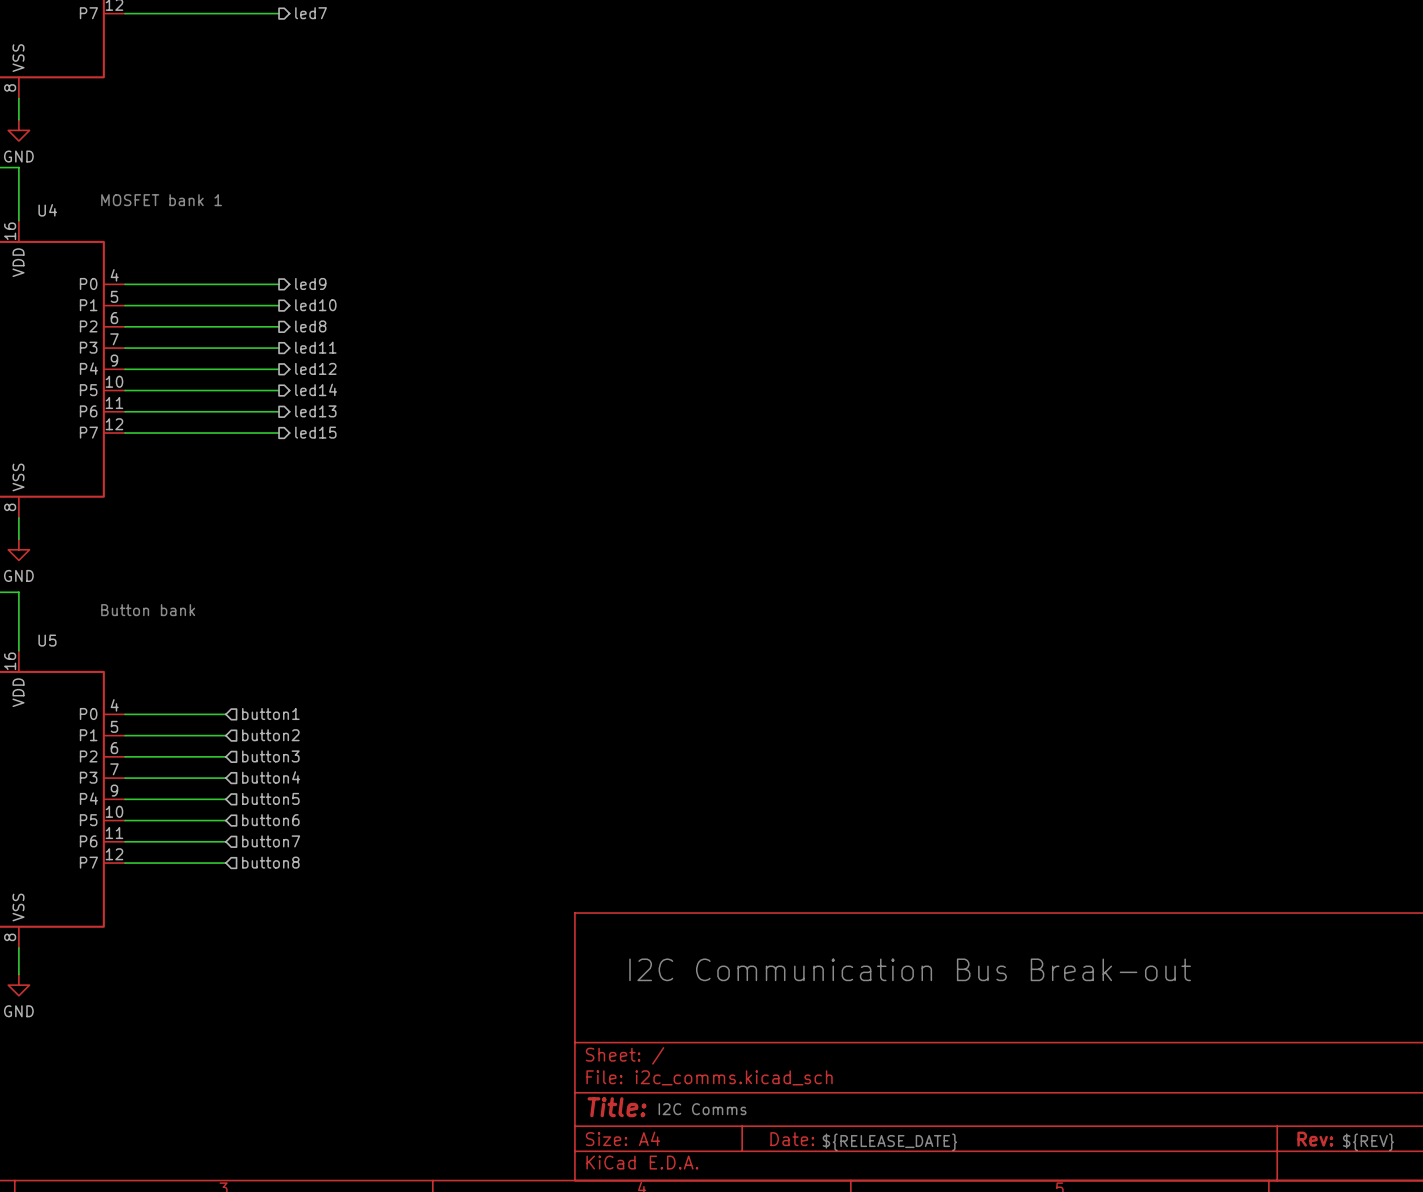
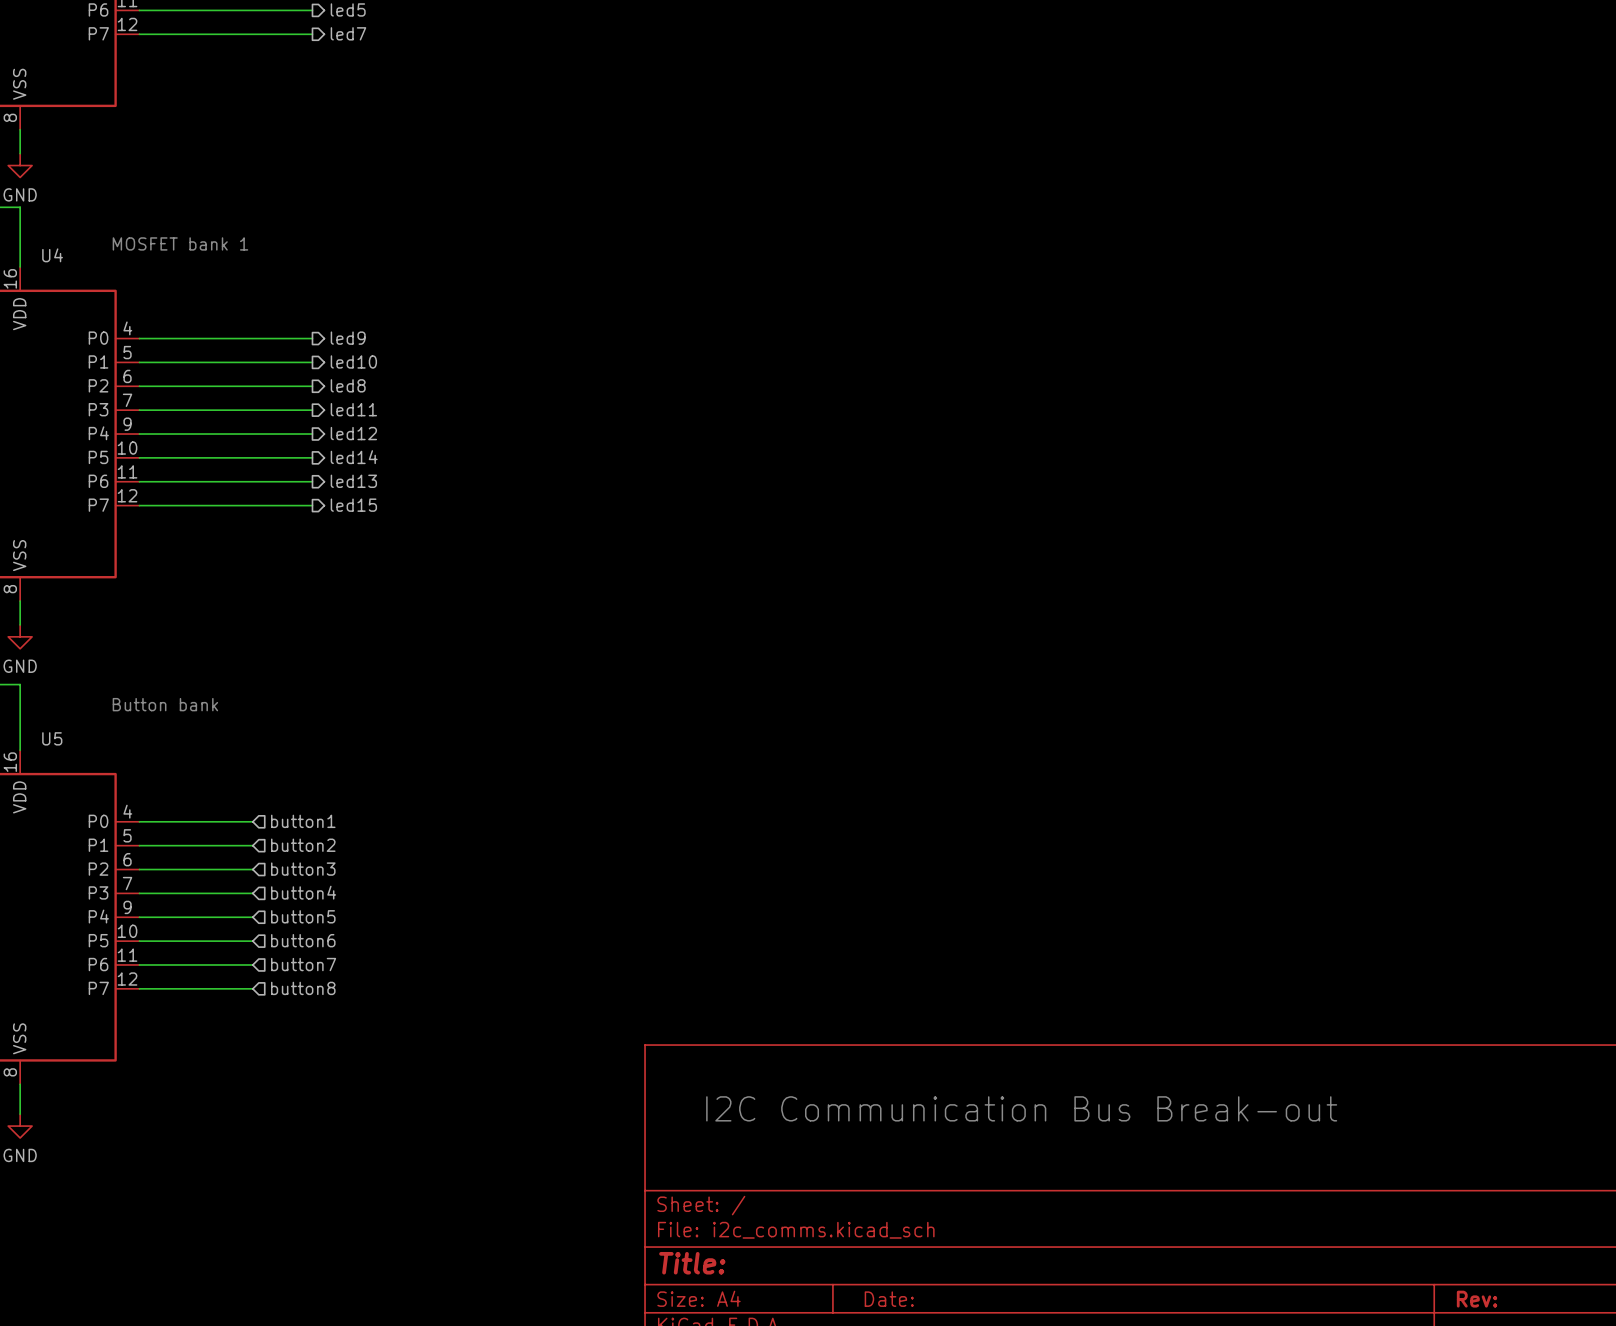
text: I2C Comms (702, 1109) -> none
text: ${RELEASE_DATE} (889, 1142) -> none
text: ${REV} (1368, 1142) -> none

